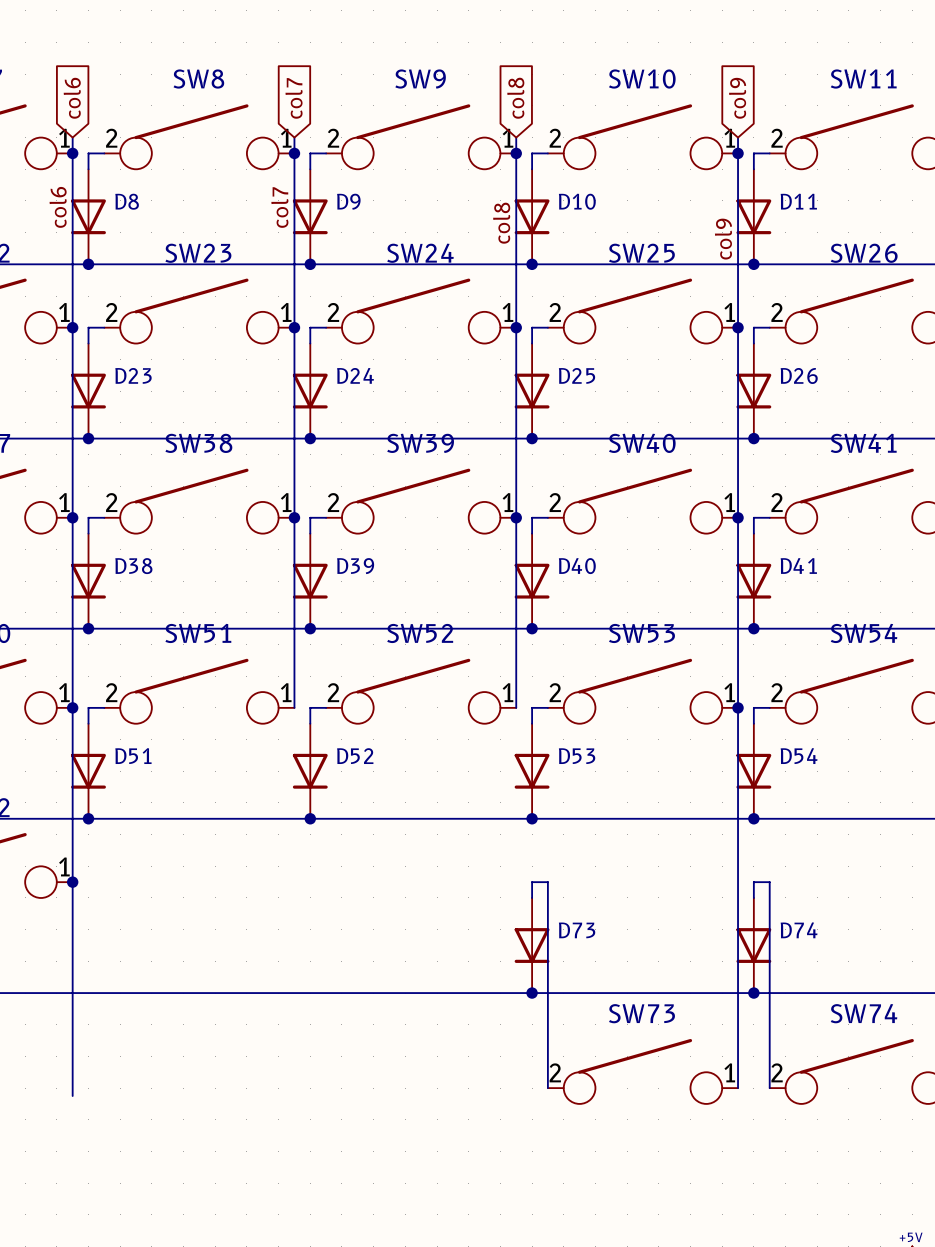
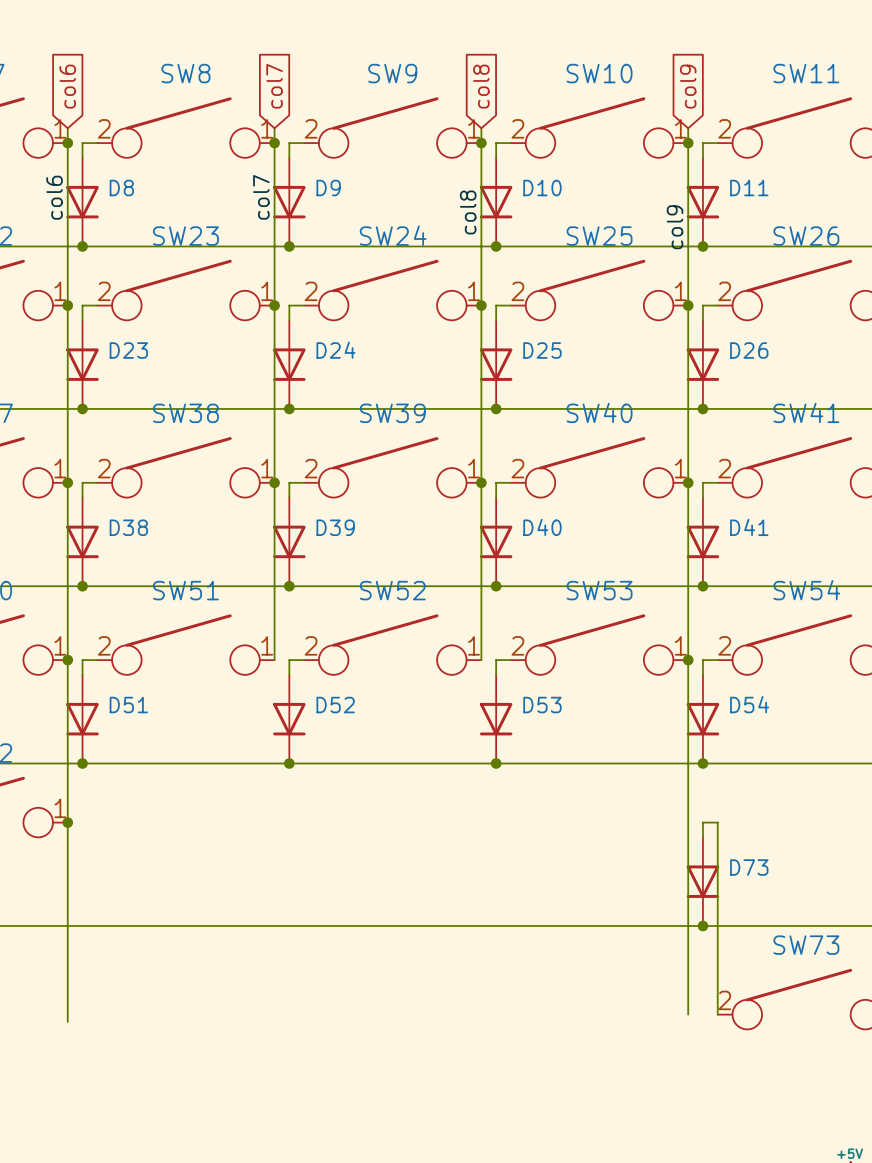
wire: (532, 897) (532, 882) (547, 882) (547, 1088) -> none
D74 name: D74 (799, 930) -> D73 (749, 867)
D73: (532, 945) -> none
junction: (532, 993) -> none
SW74 name: SW74 (864, 1013) -> SW73 (806, 945)
SW73: (642, 1071) -> none

